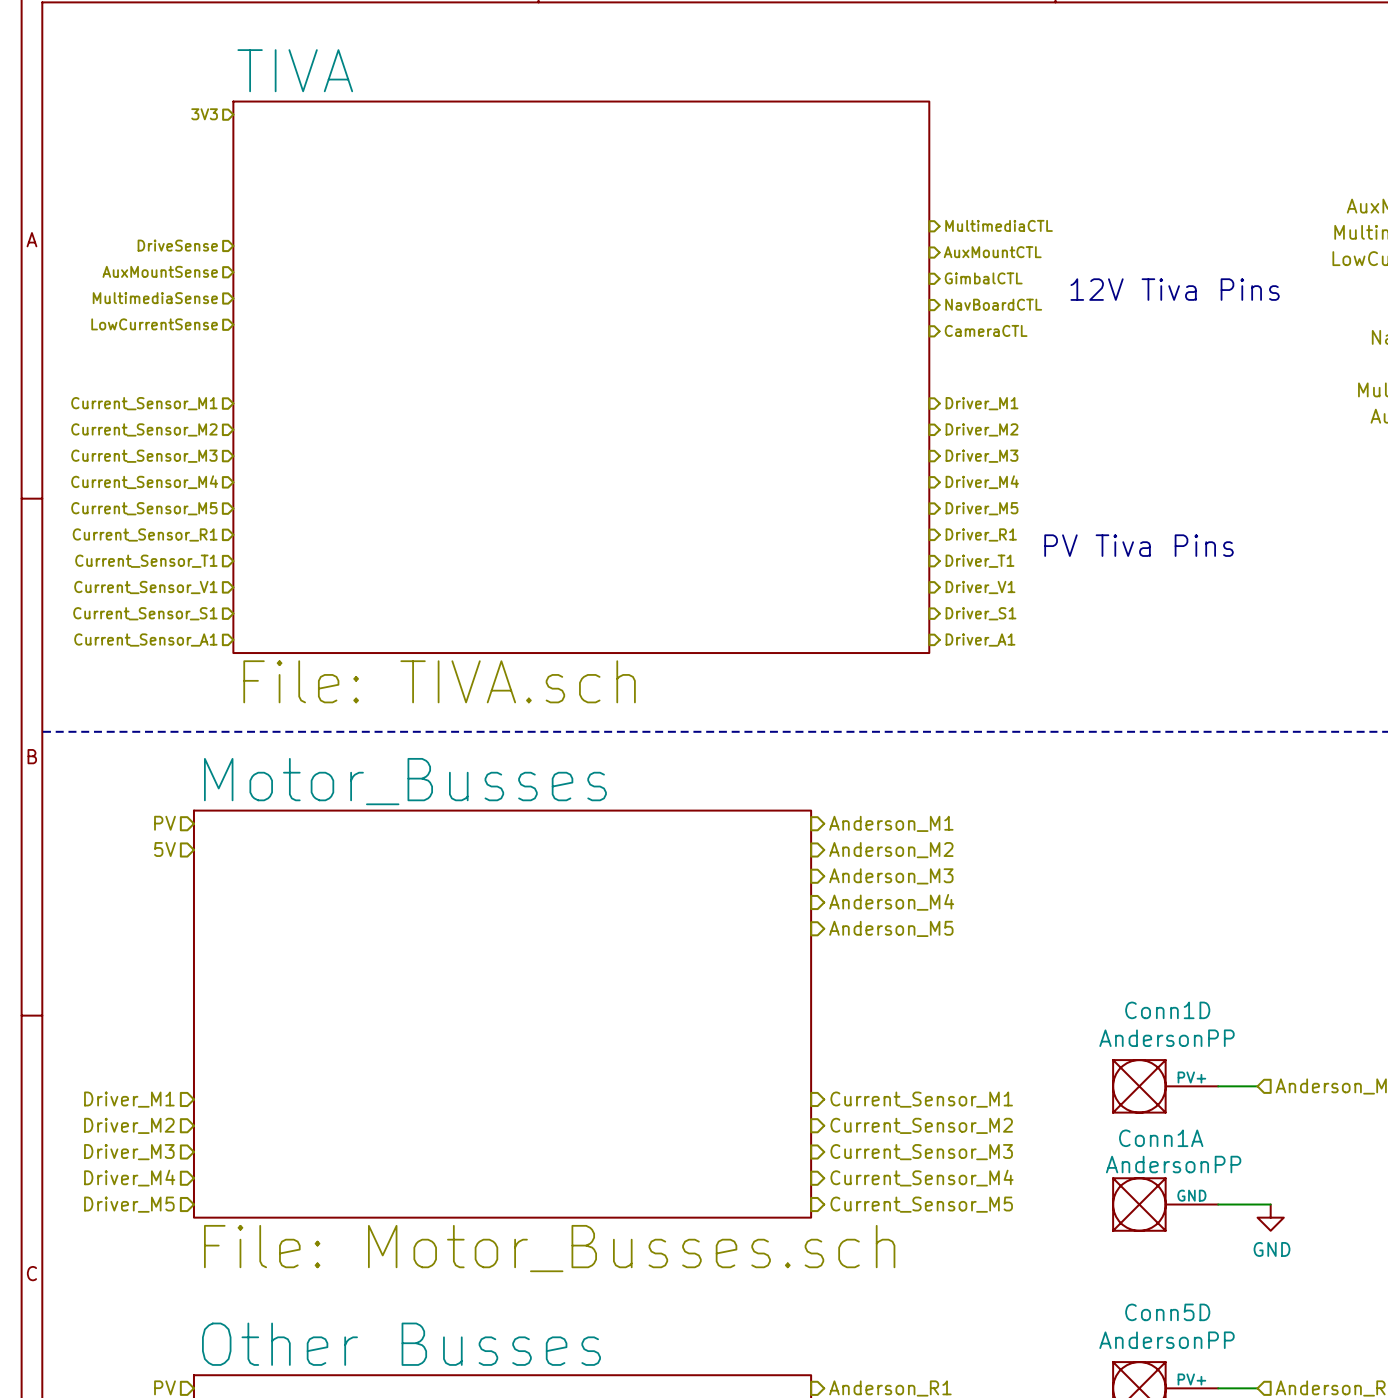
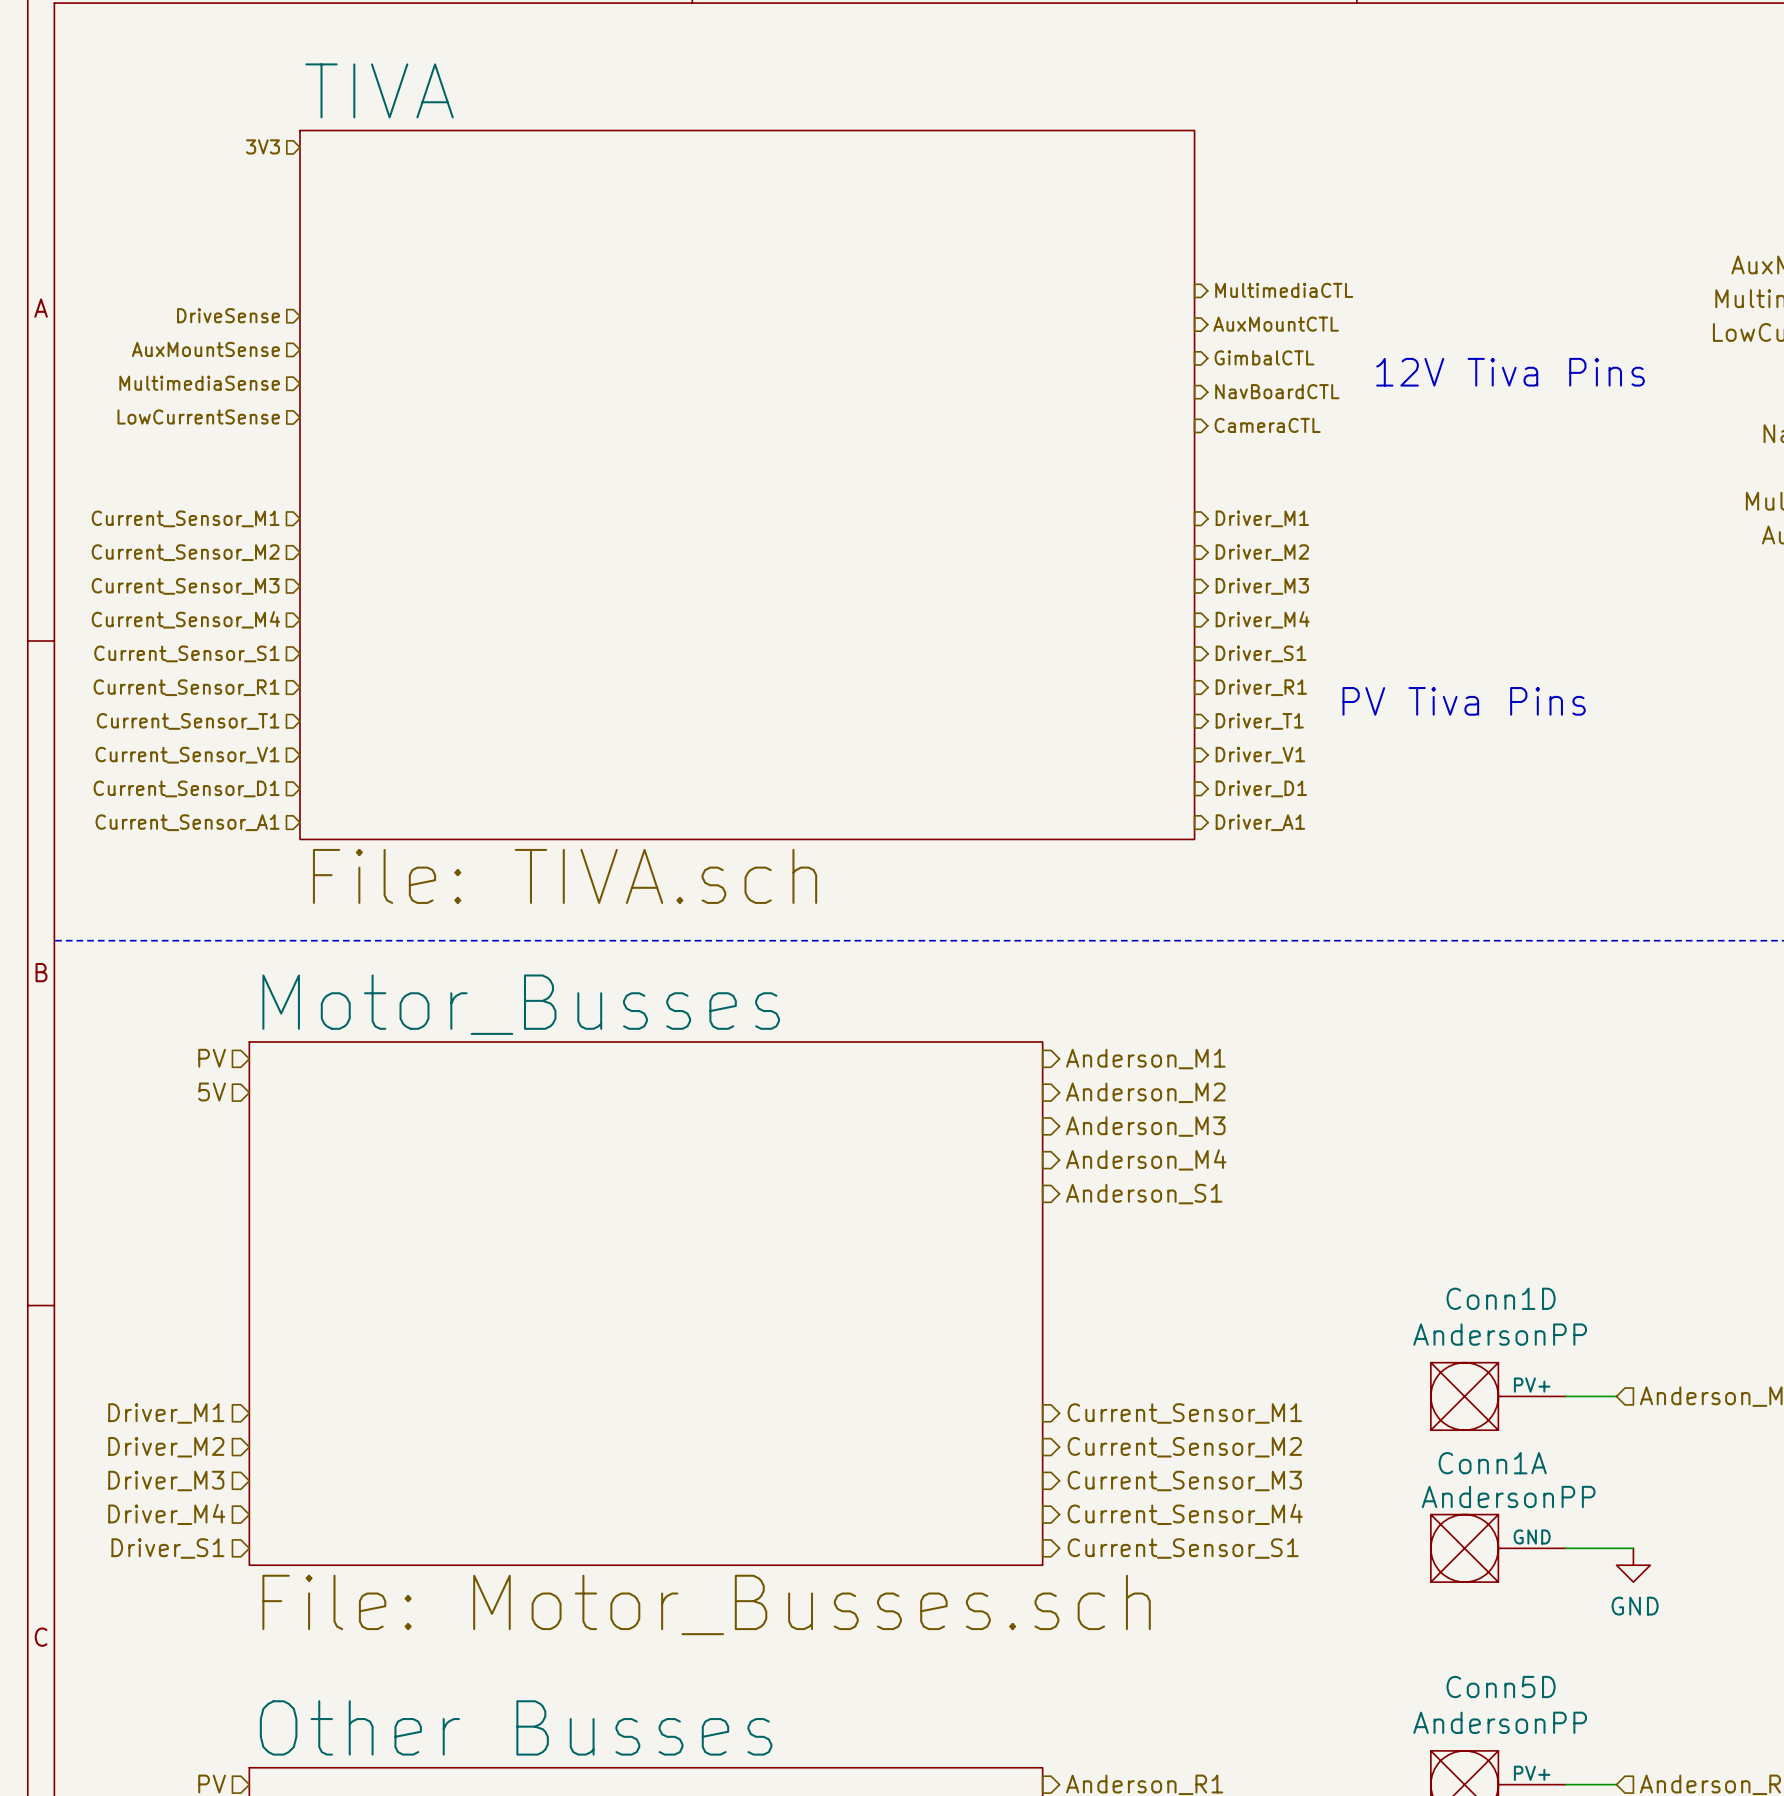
hierarchical label: Current_Sensor_M5 (144, 508) -> Current_Sensor_S1 (186, 653)
hierarchical label: Driver_M5 (982, 508) -> Driver_S1 (1261, 653)
hierarchical label: Current_Sensor_S1 (145, 613) -> Current_Sensor_D1 (186, 788)
hierarchical label: Driver_S1 (981, 613) -> Driver_D1 (1261, 788)
hierarchical label: Anderson_M5 (891, 928) -> Anderson_S1 (1144, 1194)
hierarchical label: Driver_M5 (129, 1204) -> Driver_S1 (167, 1548)
hierarchical label: Current_Sensor_M5 (921, 1204) -> Current_Sensor_S1 (1183, 1548)

